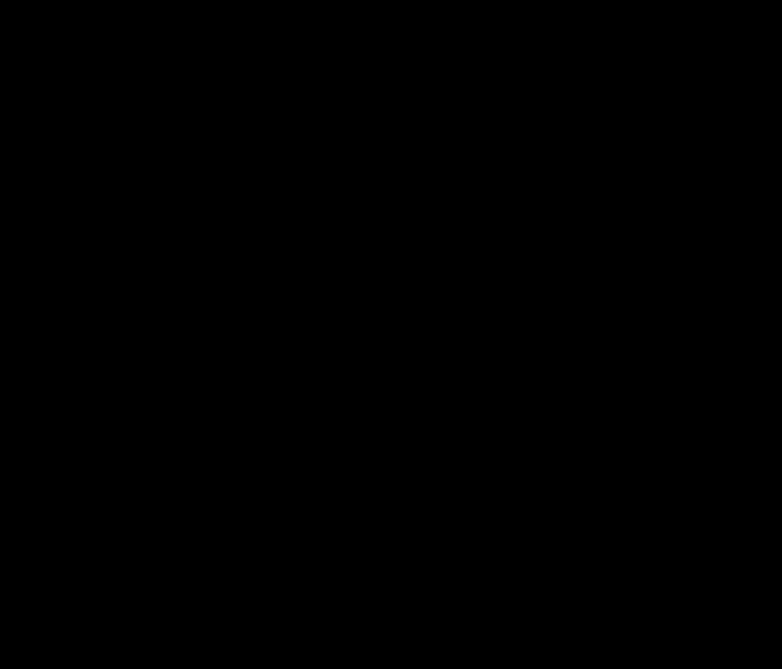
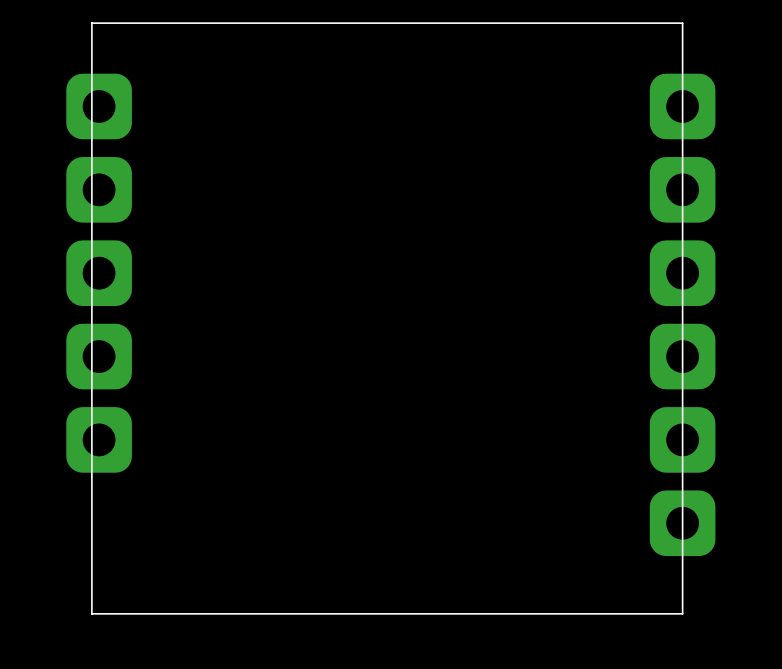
board edge: none -> (682, 23) (682, 613) (91, 613) (91, 23) (682, 23)
part: none -> (99, 106)
part: none -> (682, 106)
part: none -> (99, 189)
part: none -> (682, 189)
part: none -> (99, 273)
part: none -> (682, 273)
part: none -> (99, 356)
part: none -> (682, 356)
part: none -> (99, 439)
part: none -> (682, 439)
part: none -> (682, 523)

